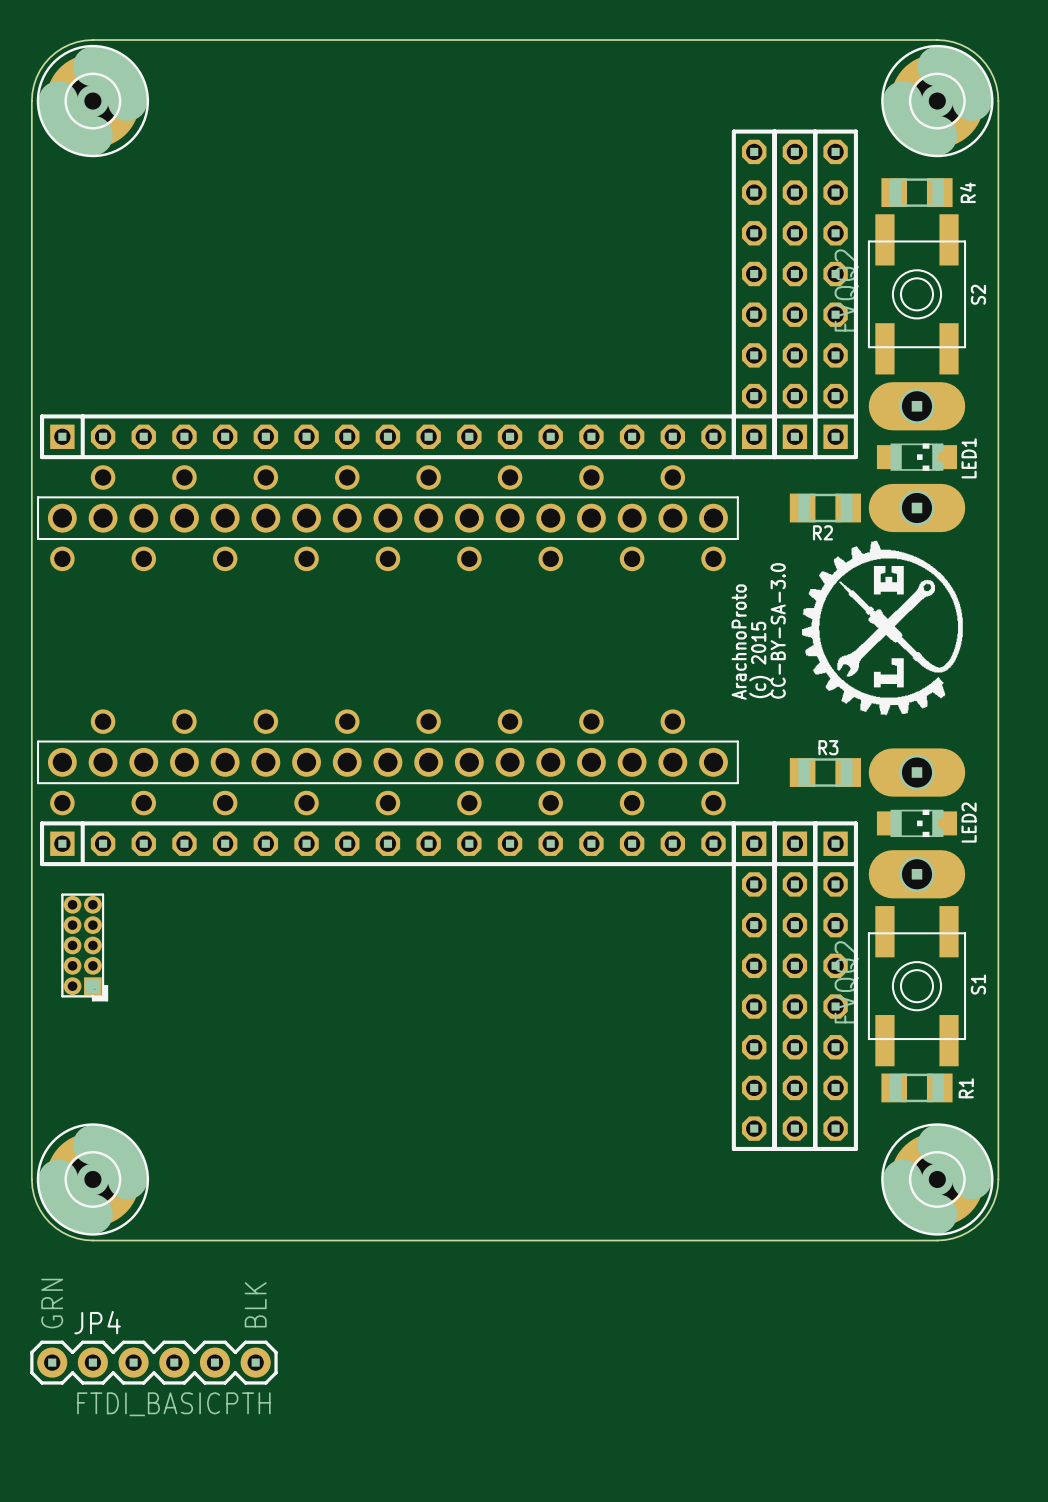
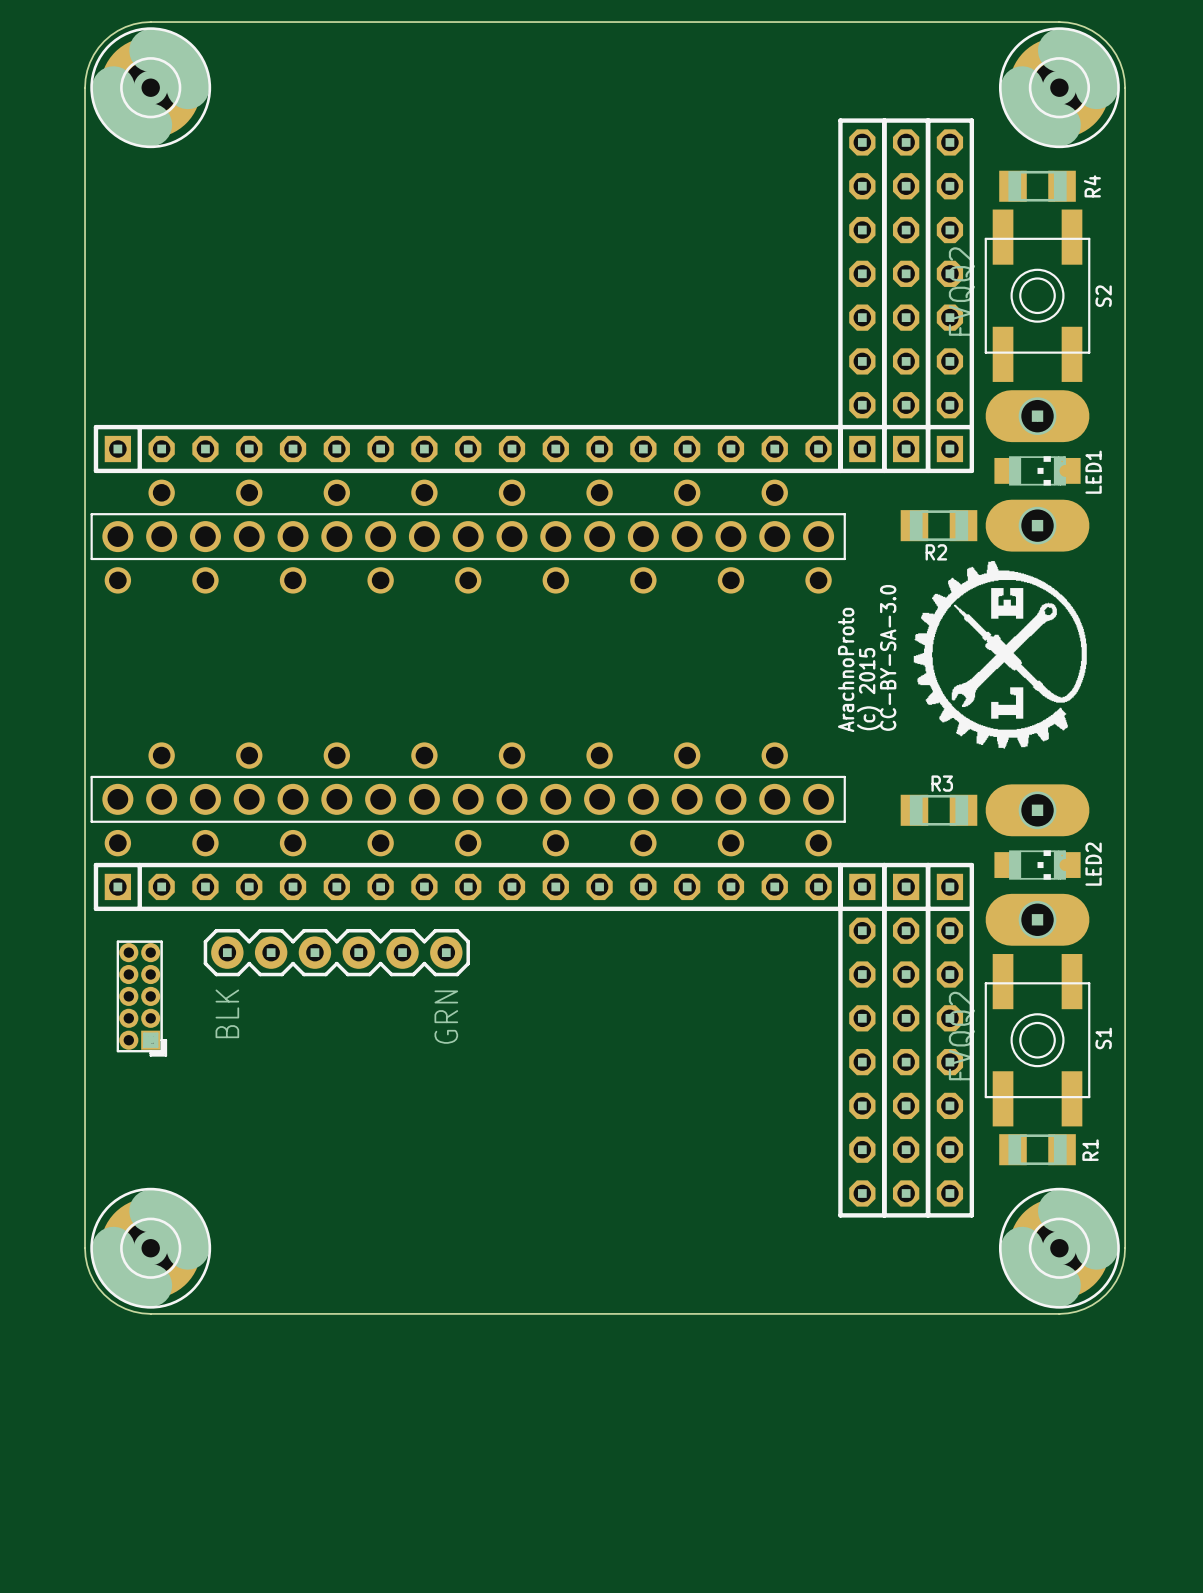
part: none -> (336, 952)
JP4: FTDI_BASICPTH (153, 1362) -> none

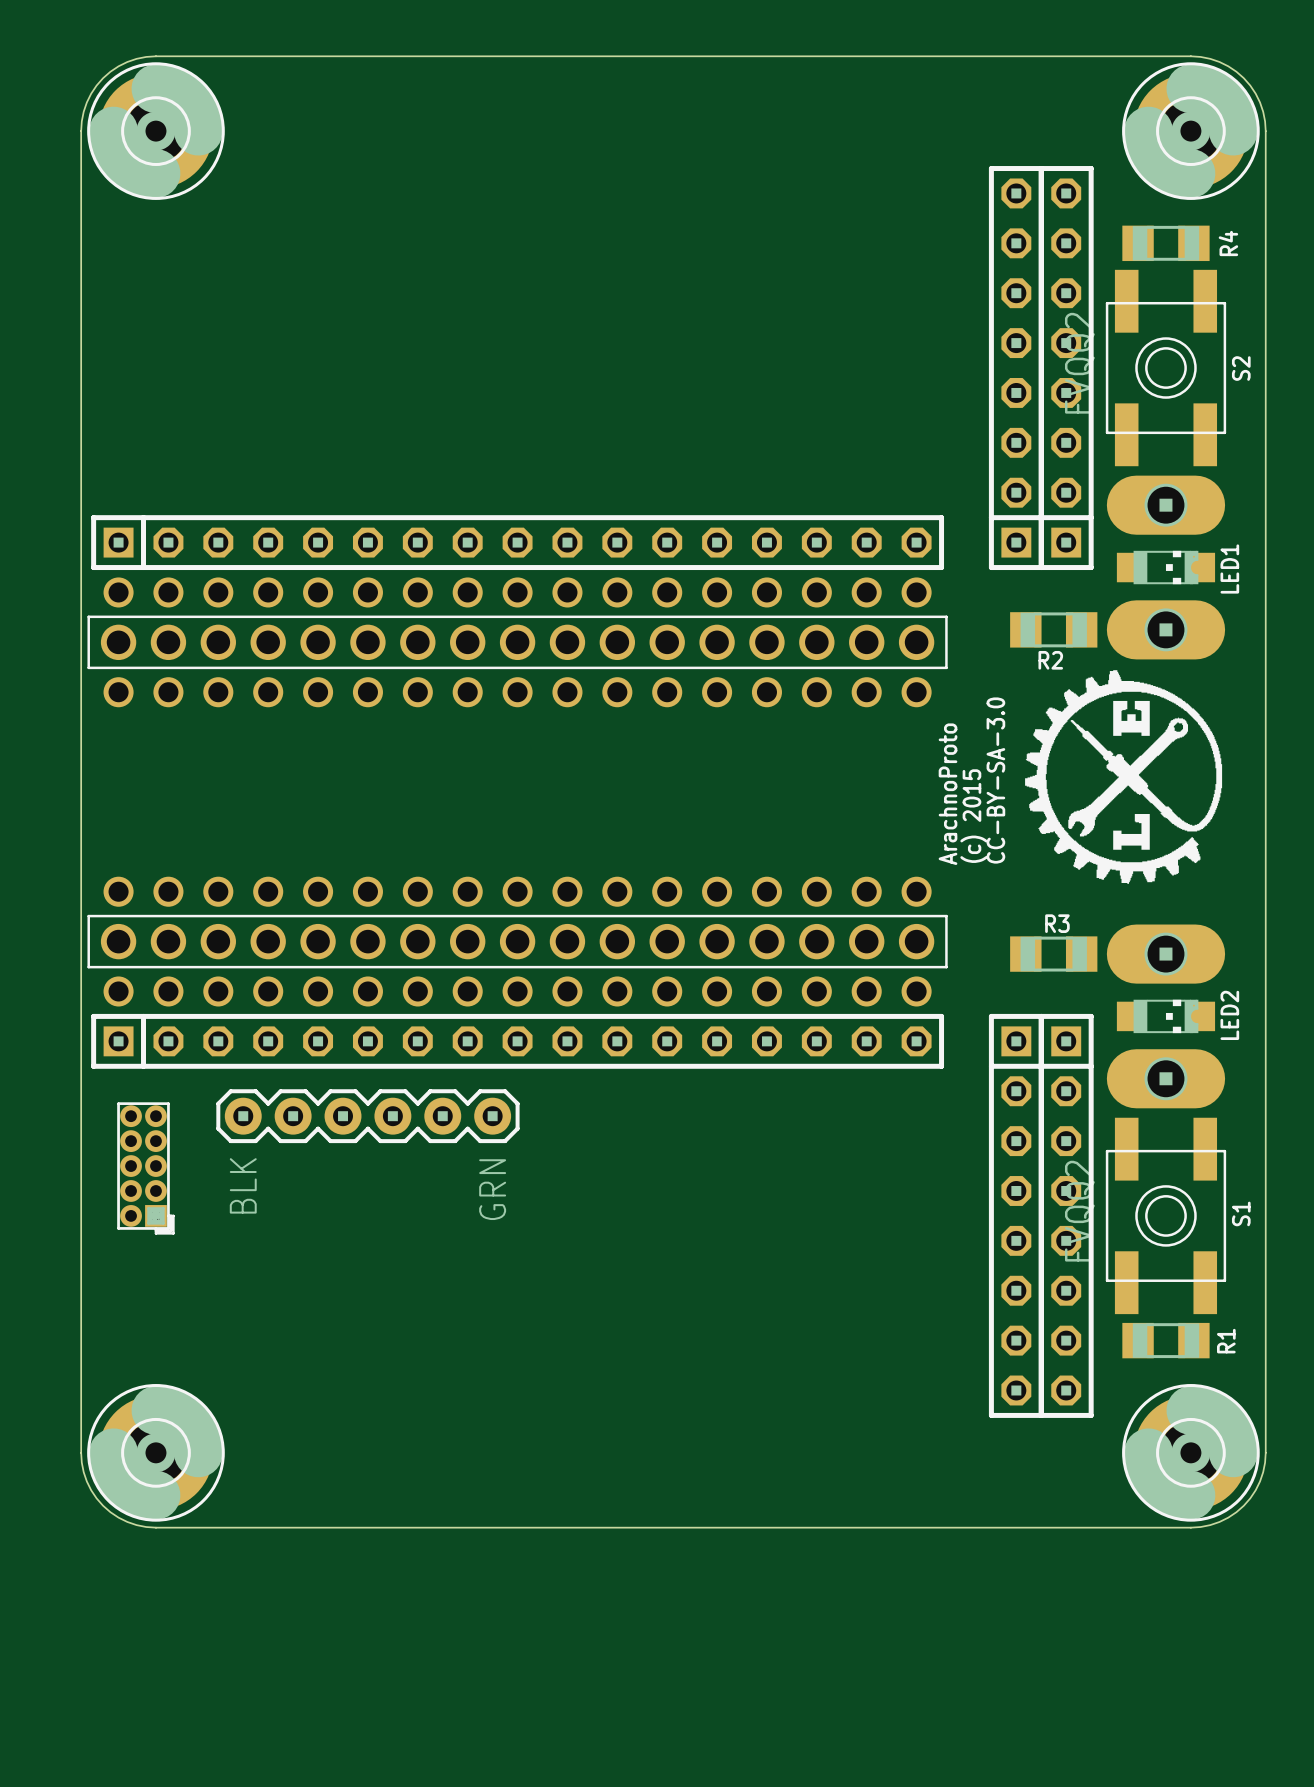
part: (862, 295) -> none
part footprint: [90, 479, 846, 594] -> [87, 577, 948, 708]
part footprint: [90, 742, 846, 857] -> [87, 876, 948, 1007]
part: (862, 1040) -> none

